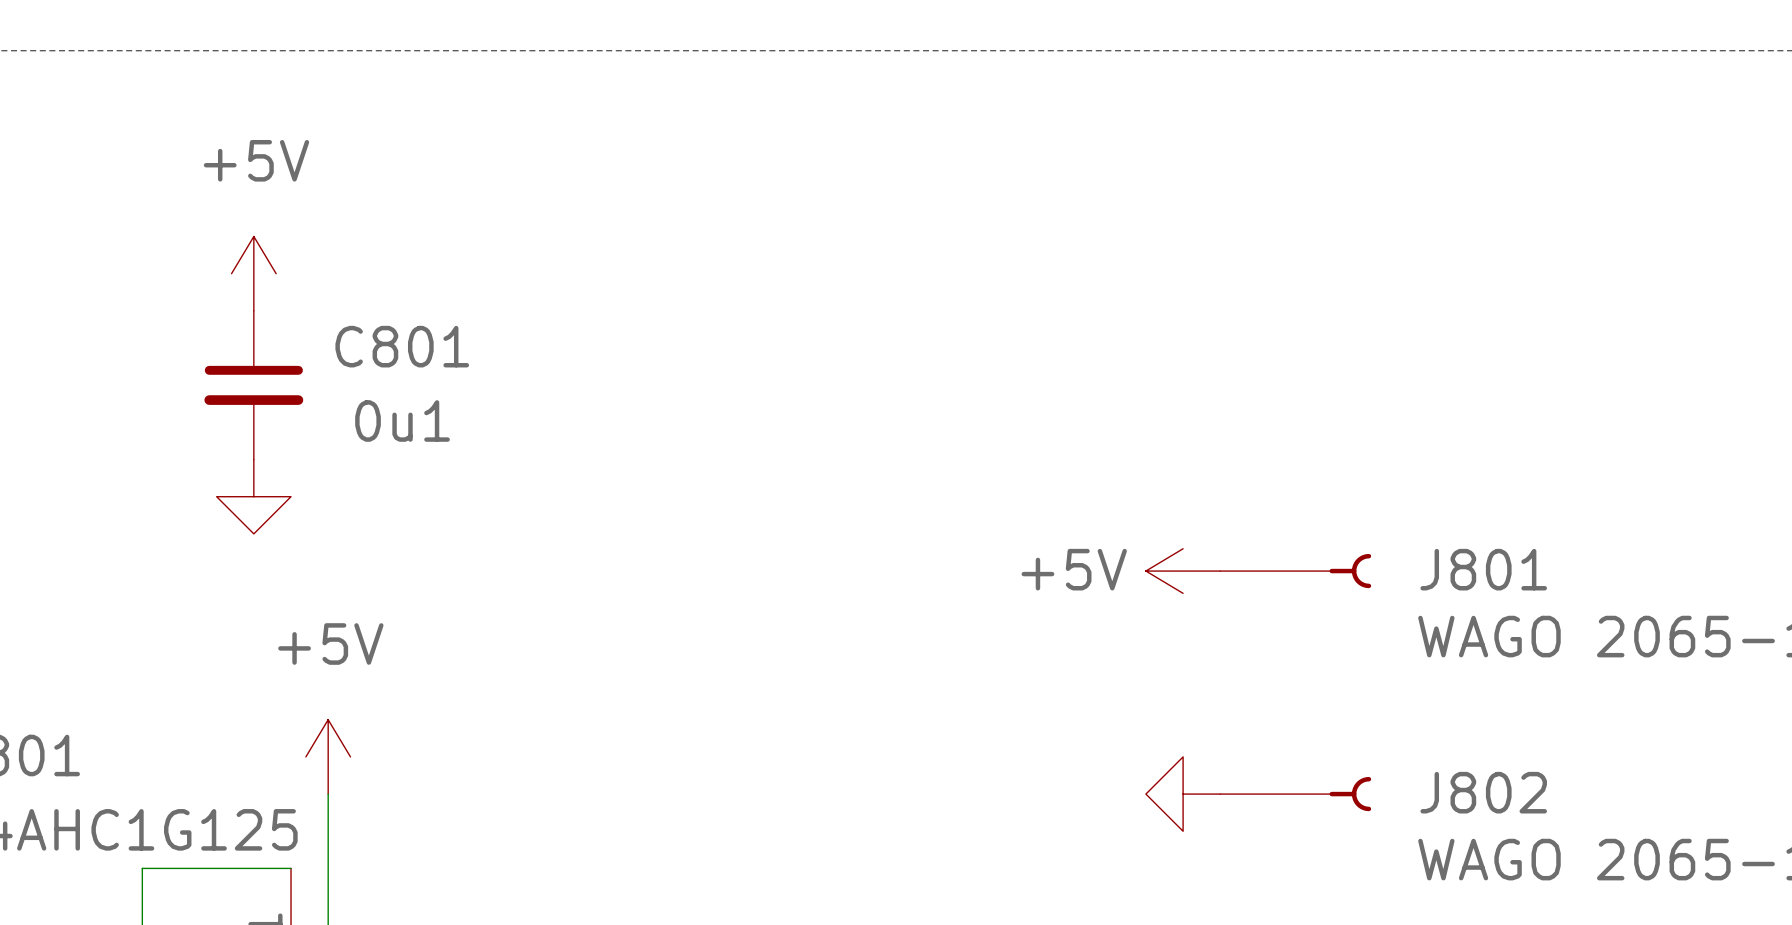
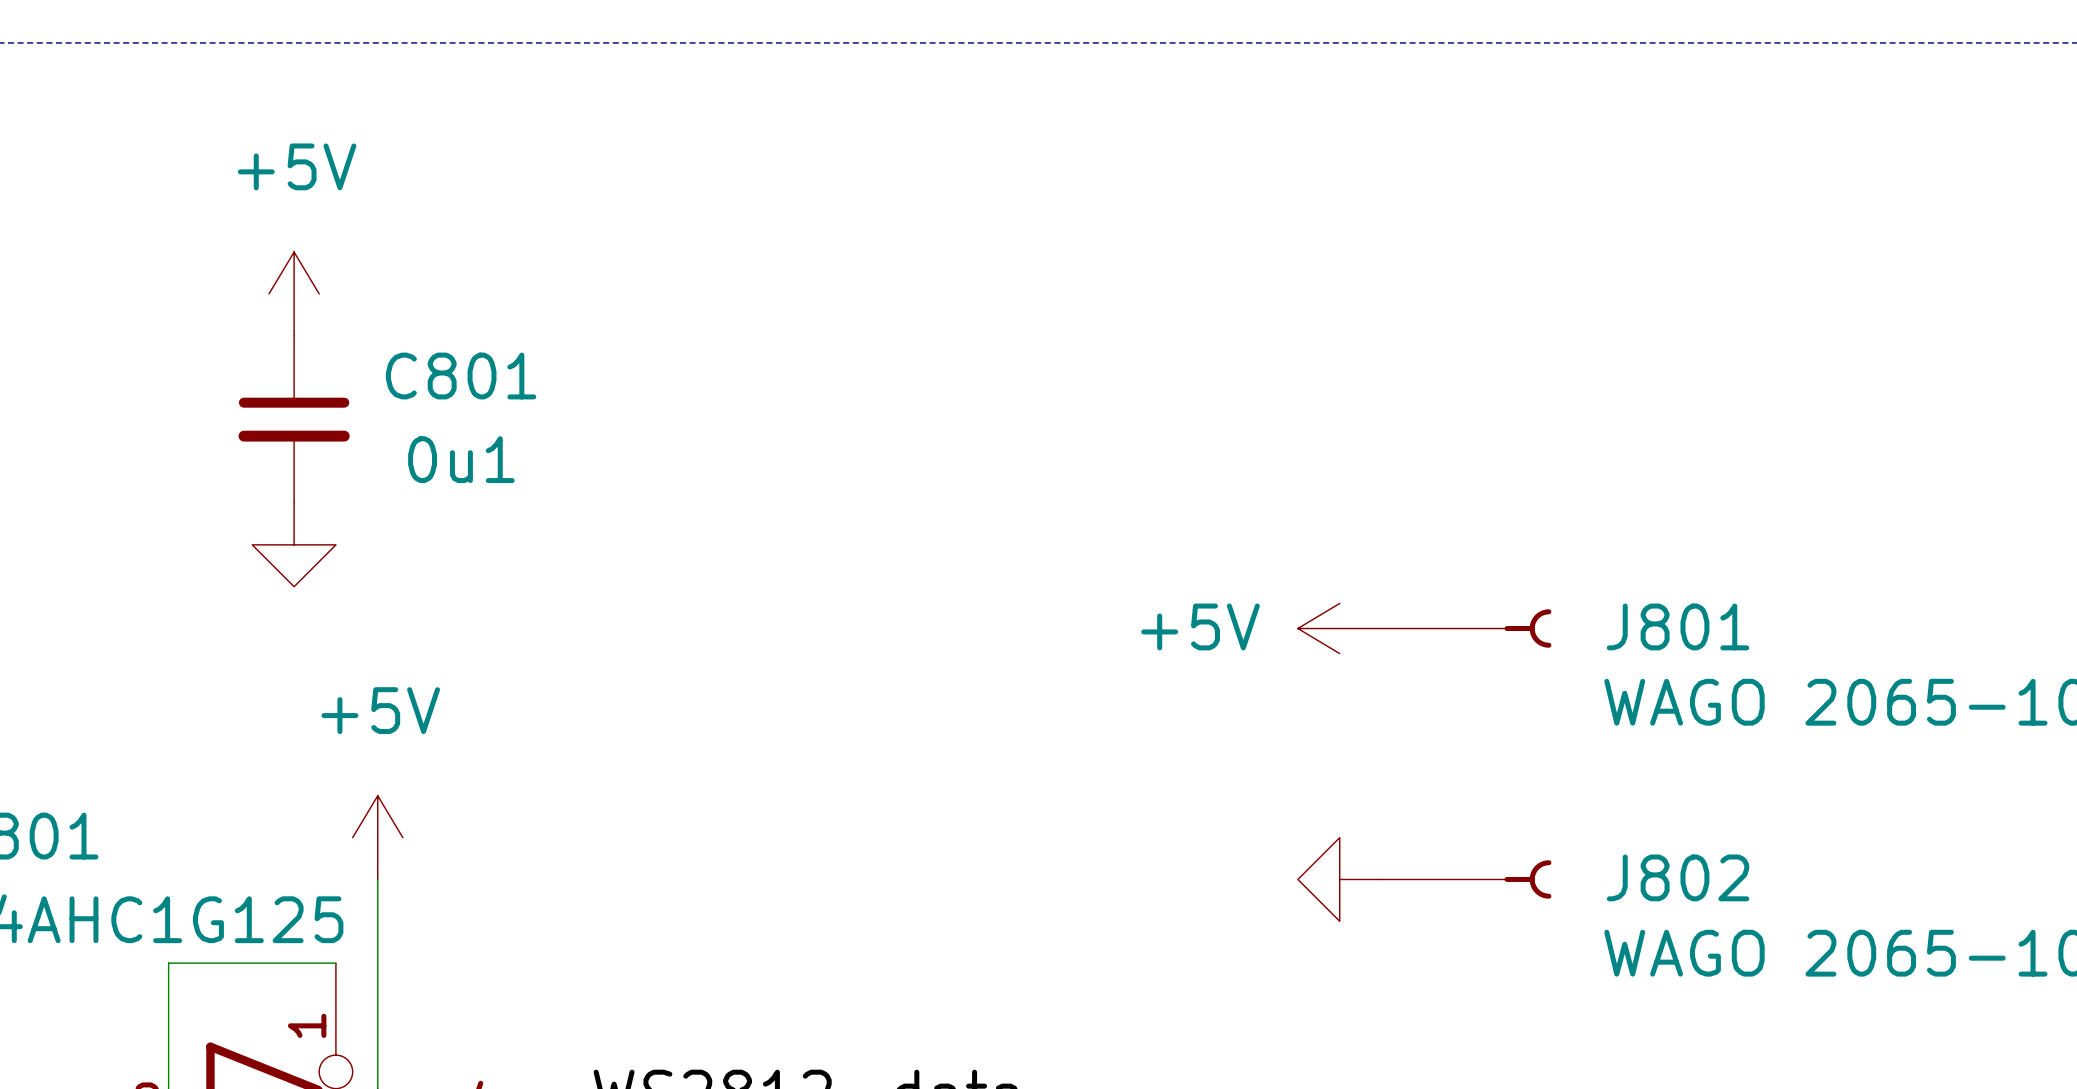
power symbol text position: +5V (1074, 569) -> +5V (1200, 626)

